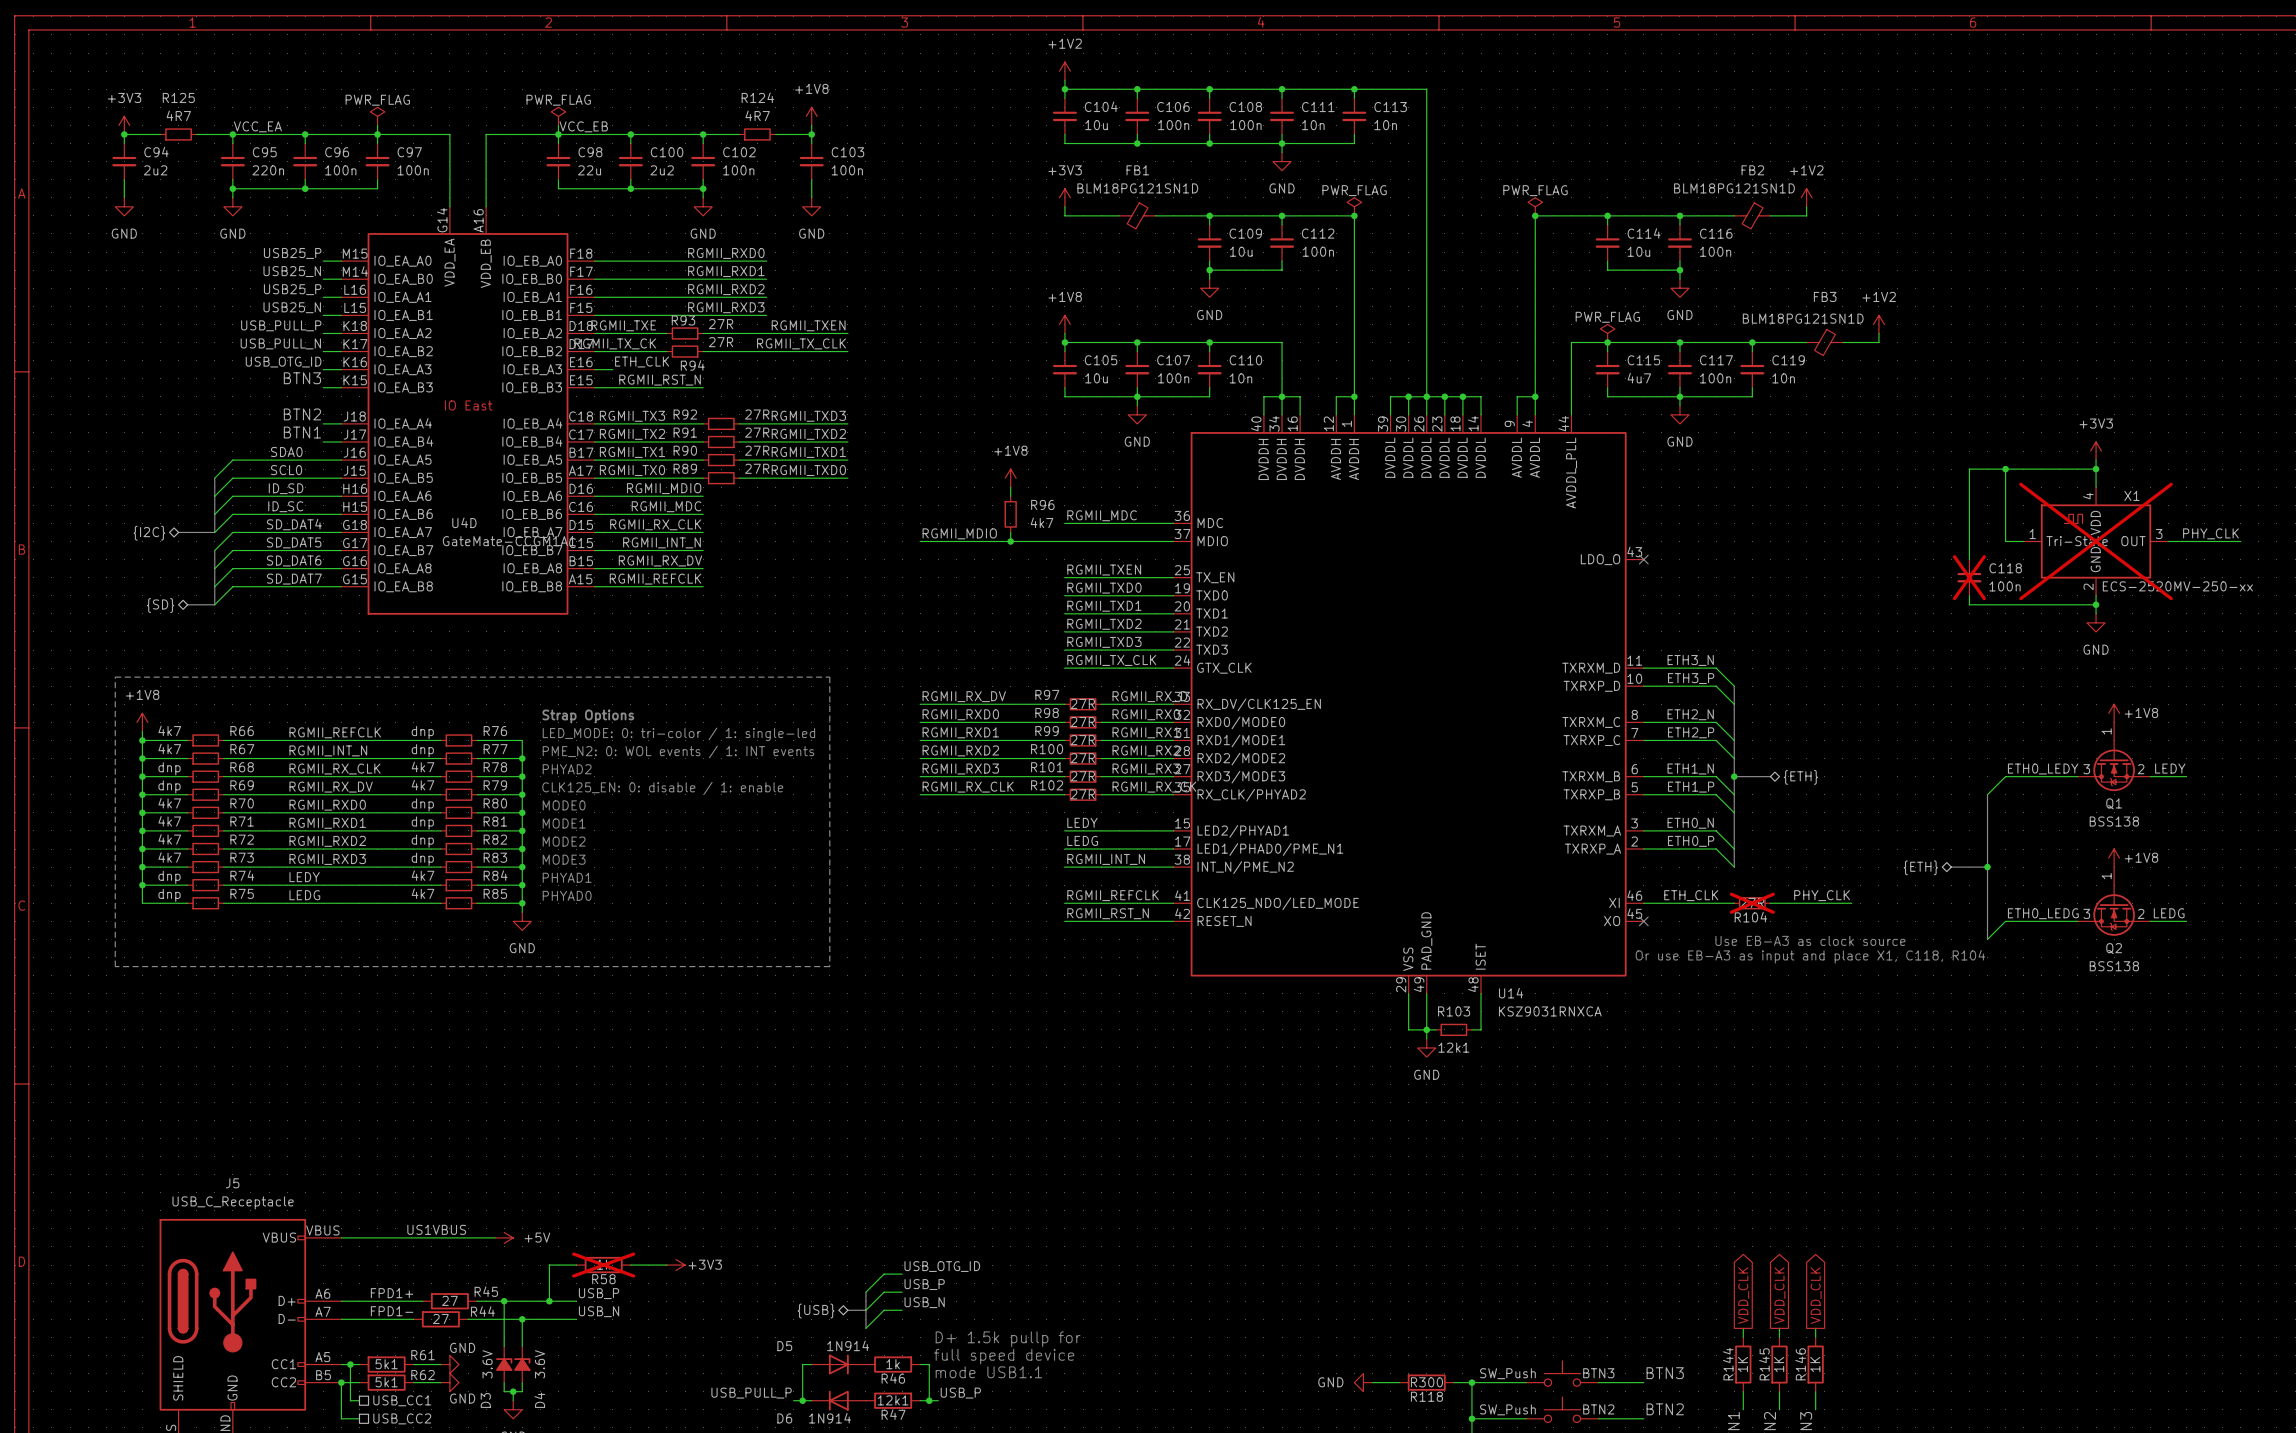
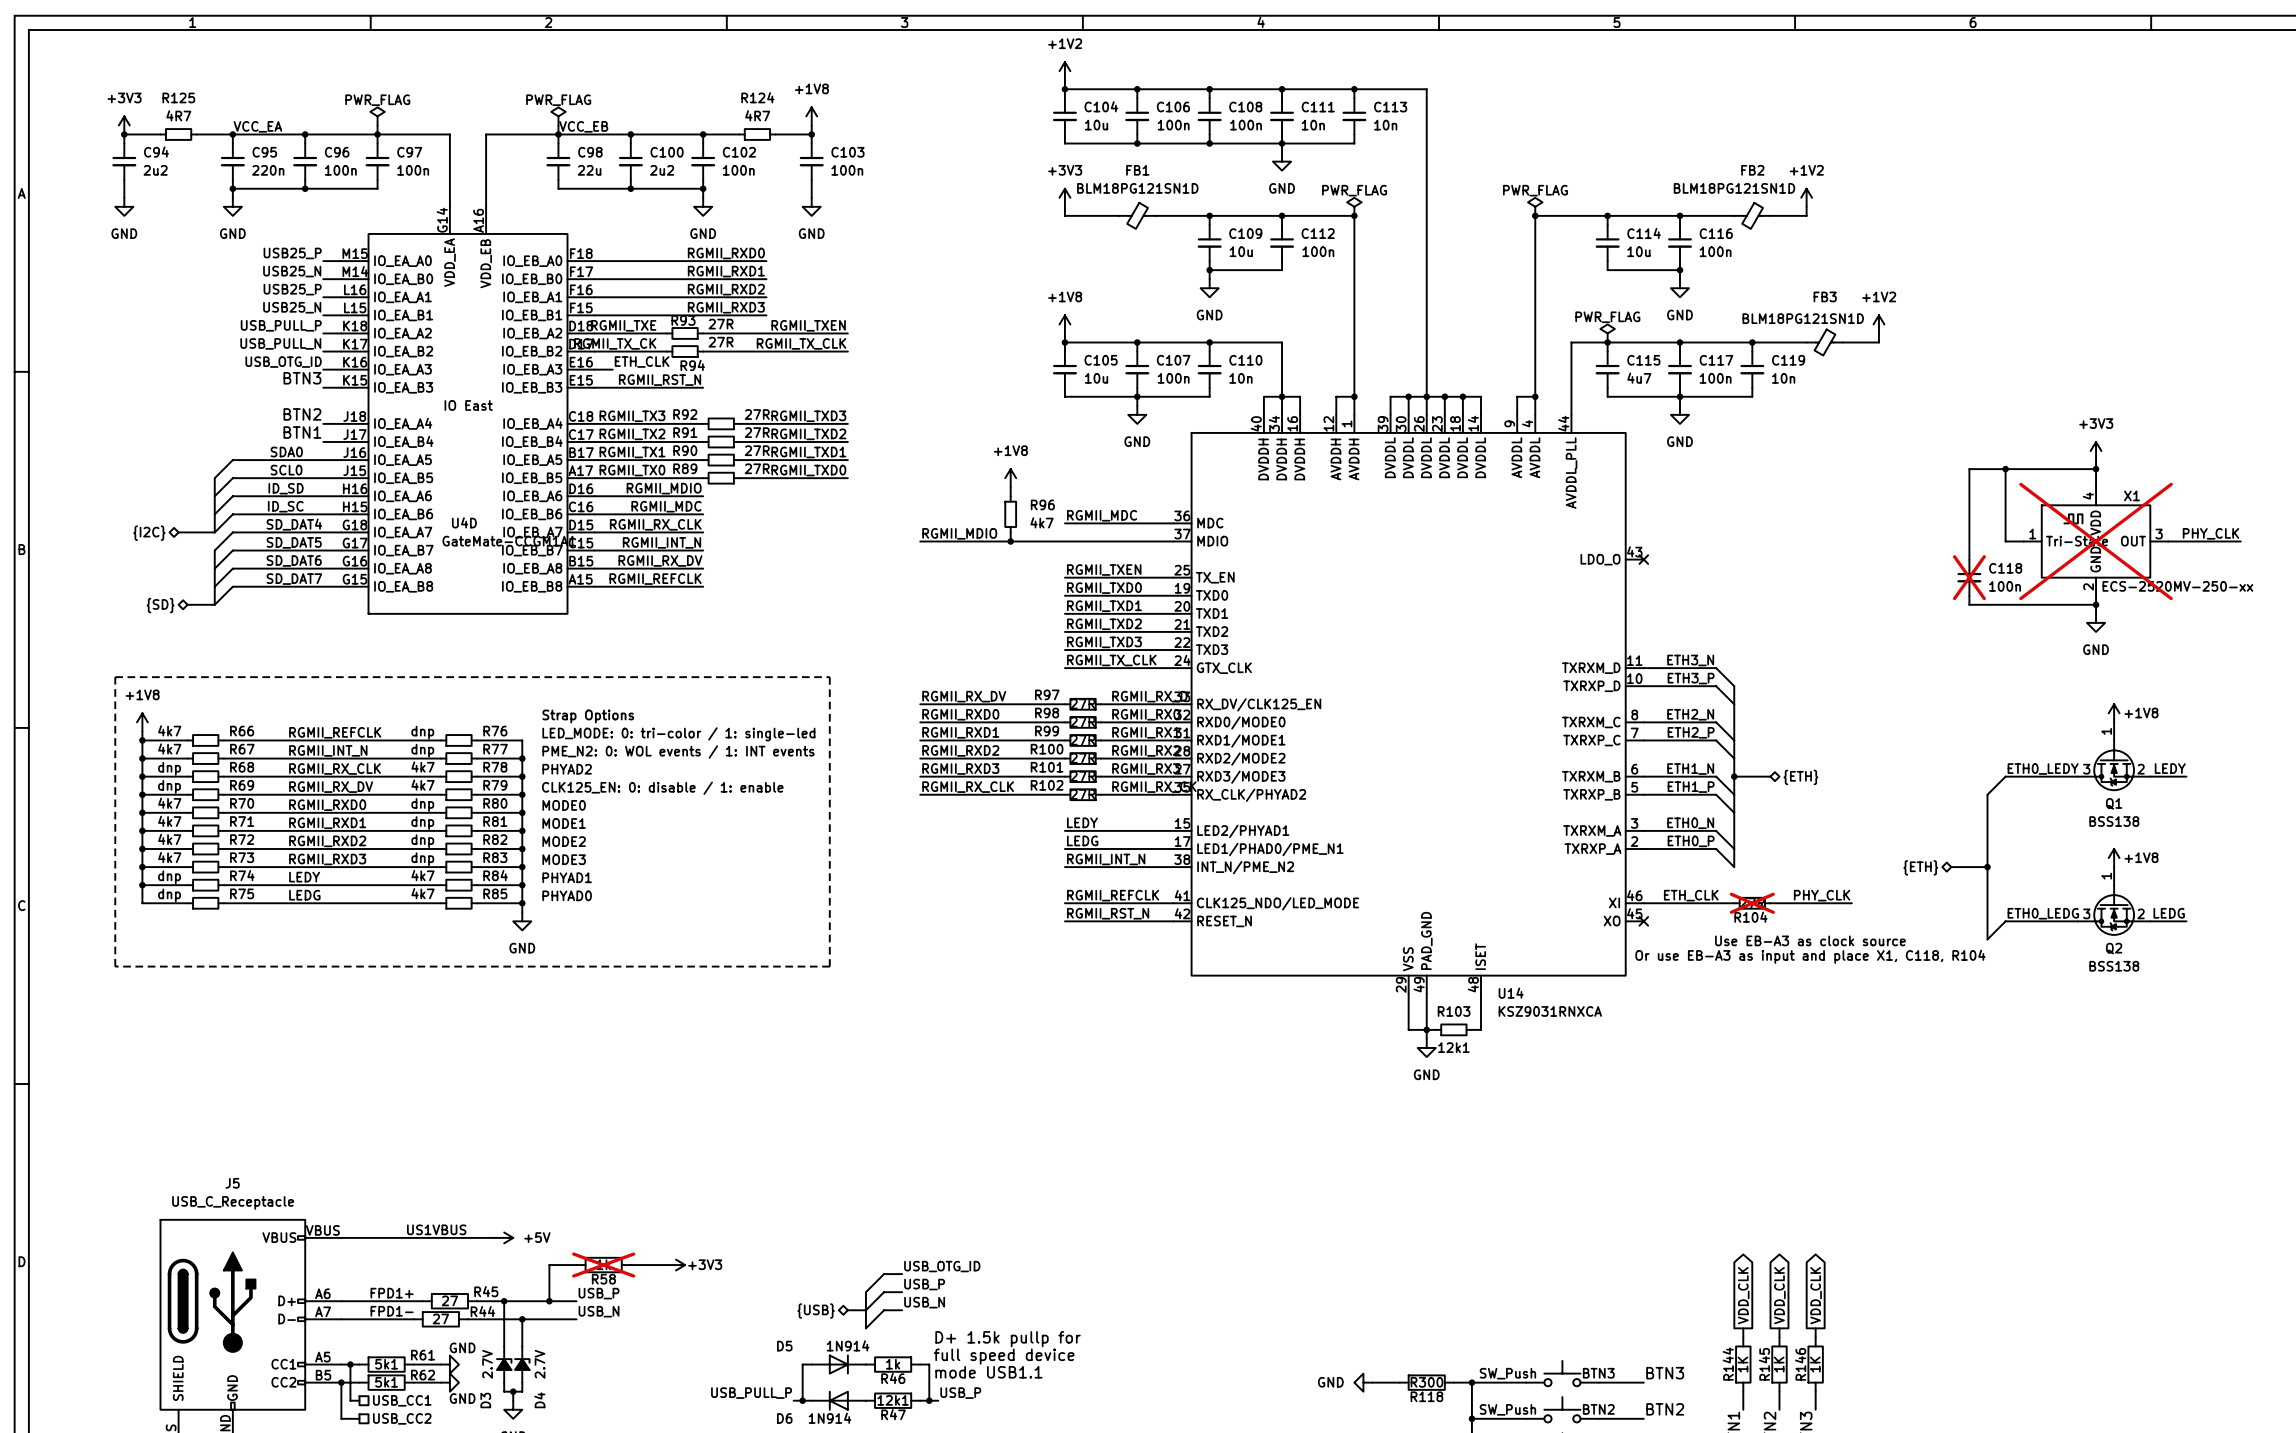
D3 value: 3.6V (487, 1364) -> 2.7V (487, 1364)
D4 value: 3.6V (540, 1364) -> 2.7V (540, 1364)

